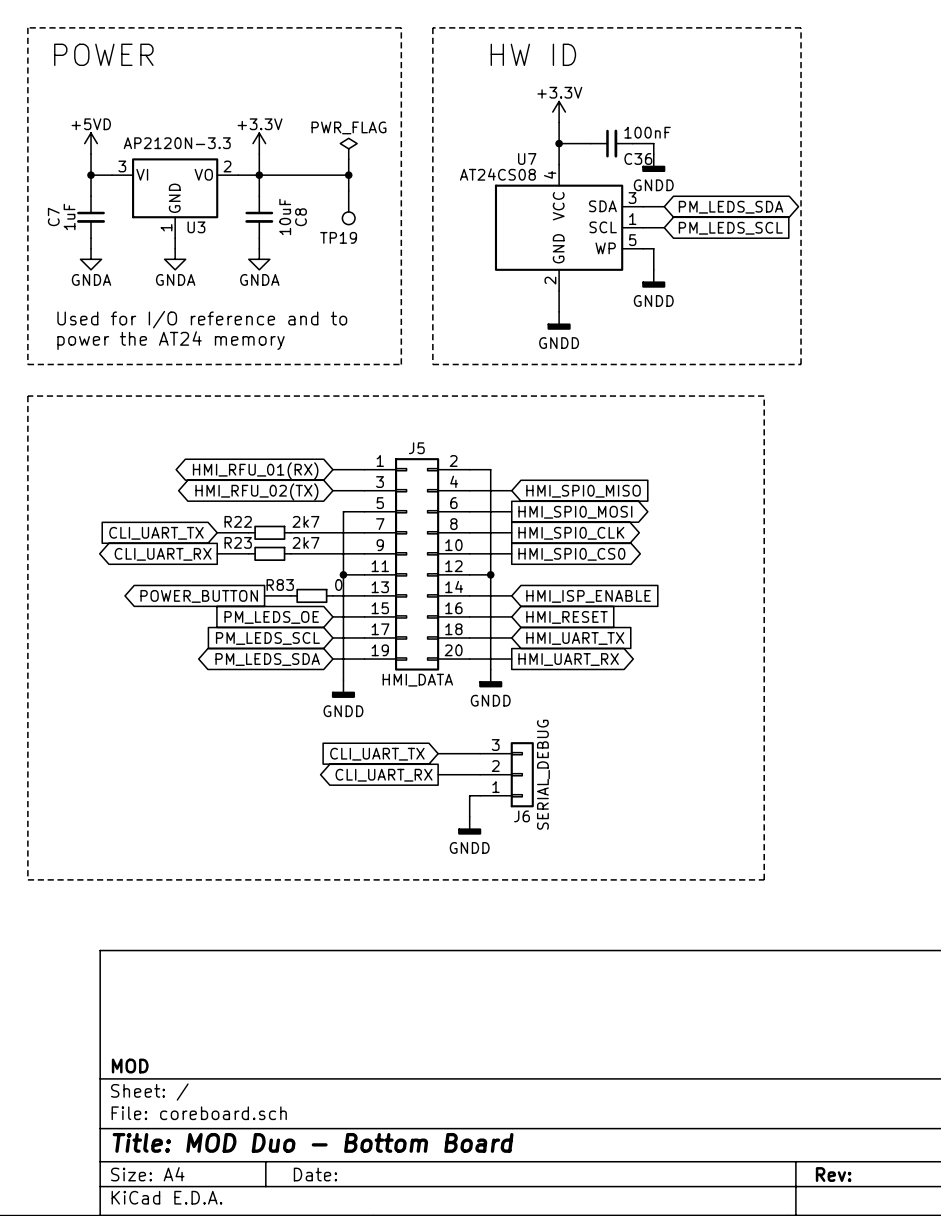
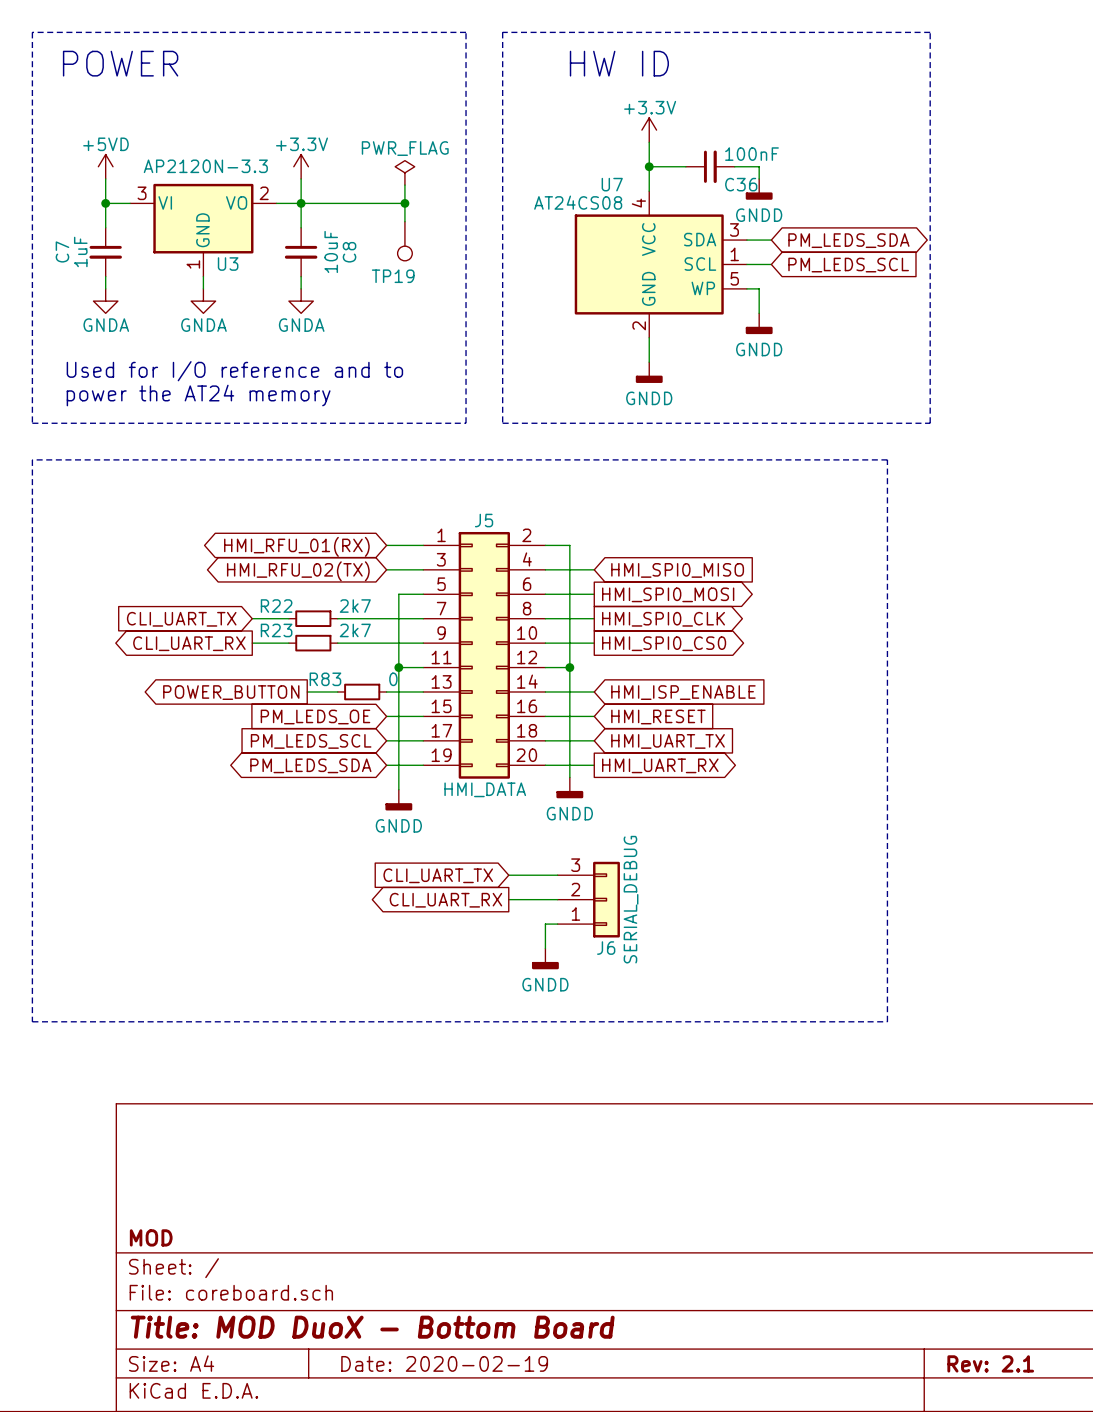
title block: Title: MOD Duo - Bottom Board (313, 1142) -> Title: MOD DuoX - Bottom Board (372, 1327)
title block: Date: (315, 1174) -> Date: 2020-02-19 (444, 1363)
title block: Rev: (833, 1174) -> Rev: 2.1 (990, 1363)

